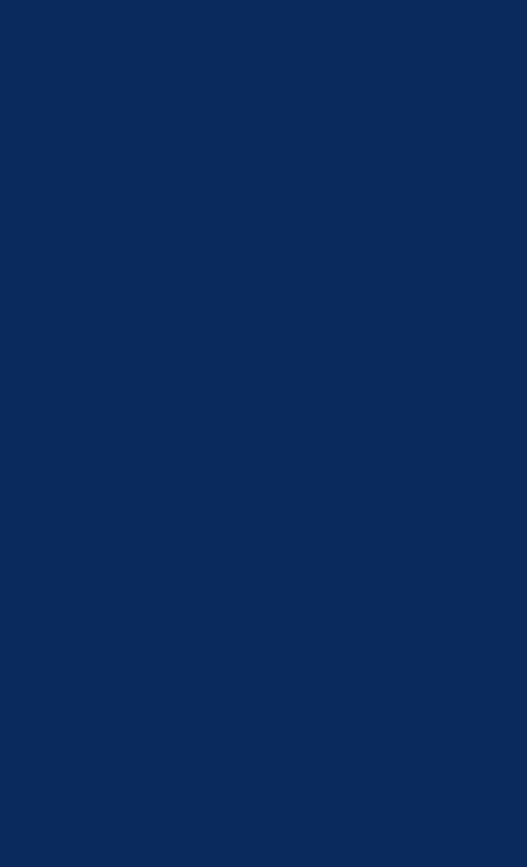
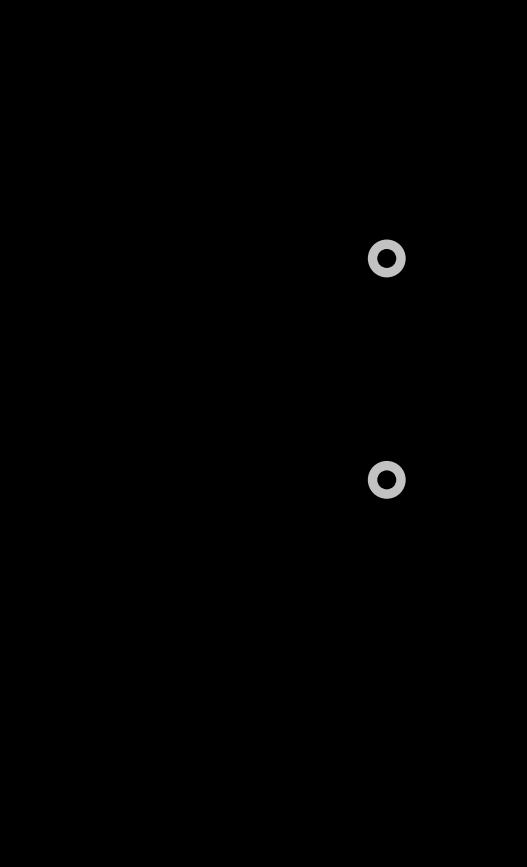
via: none -> (386, 258)
via: none -> (386, 479)

